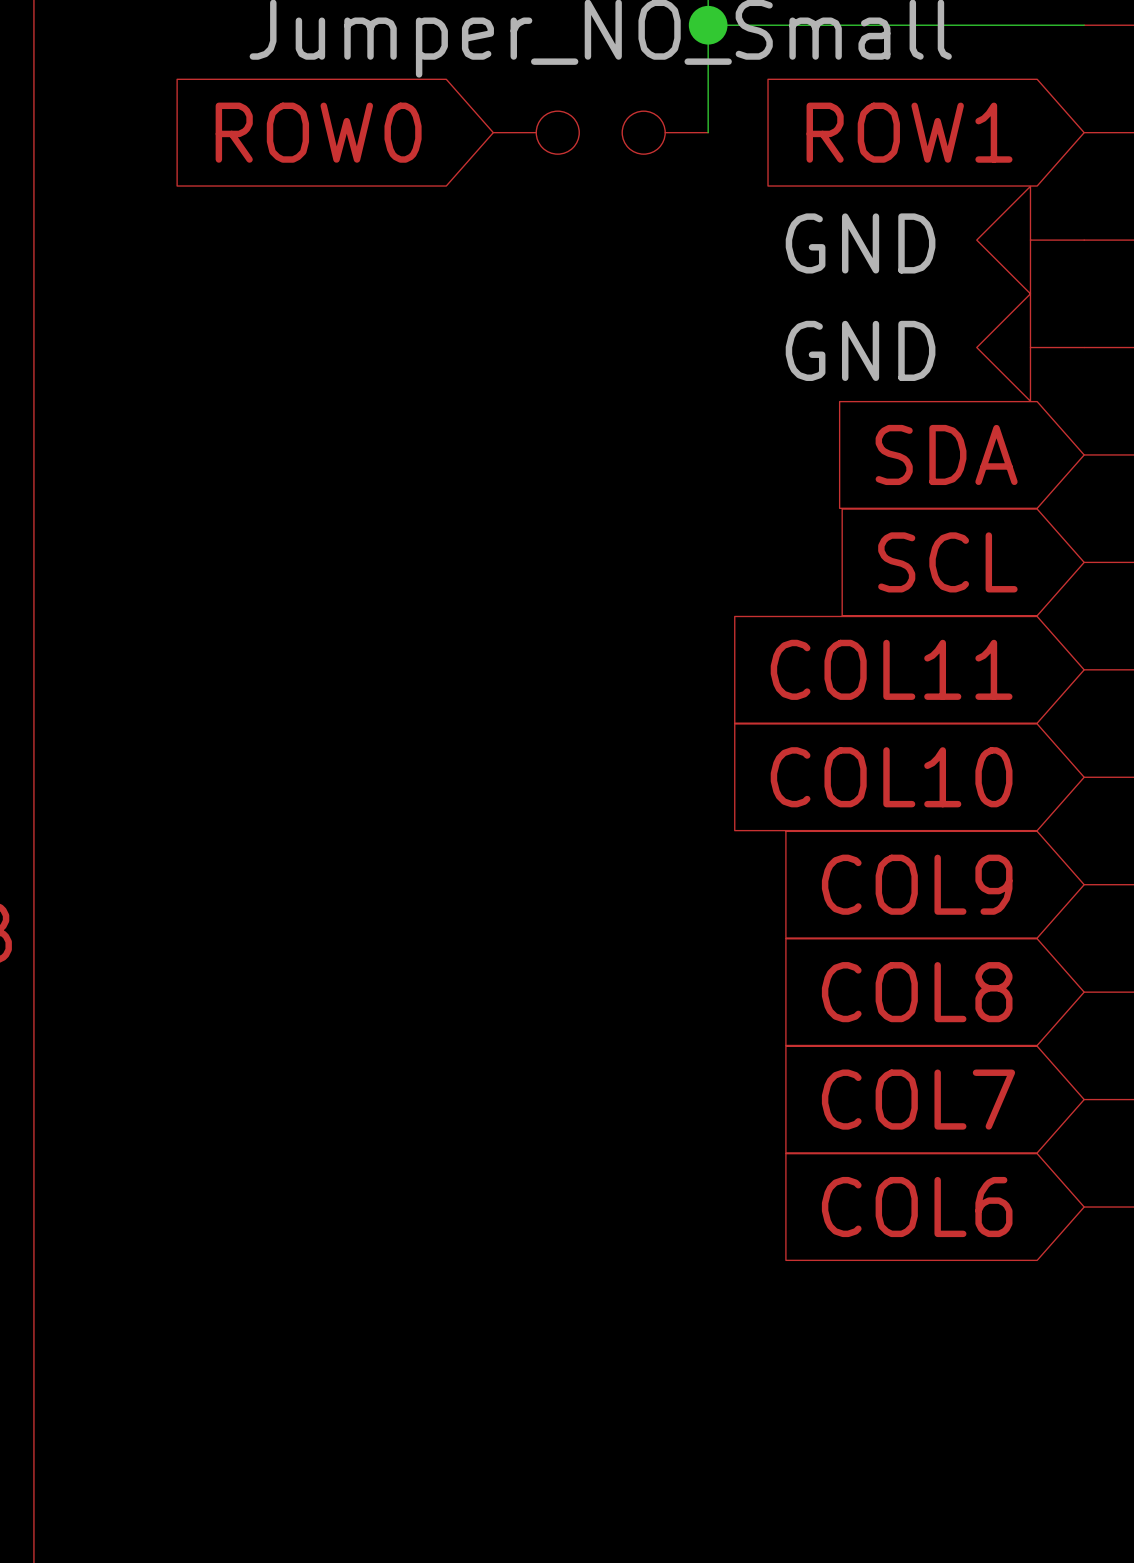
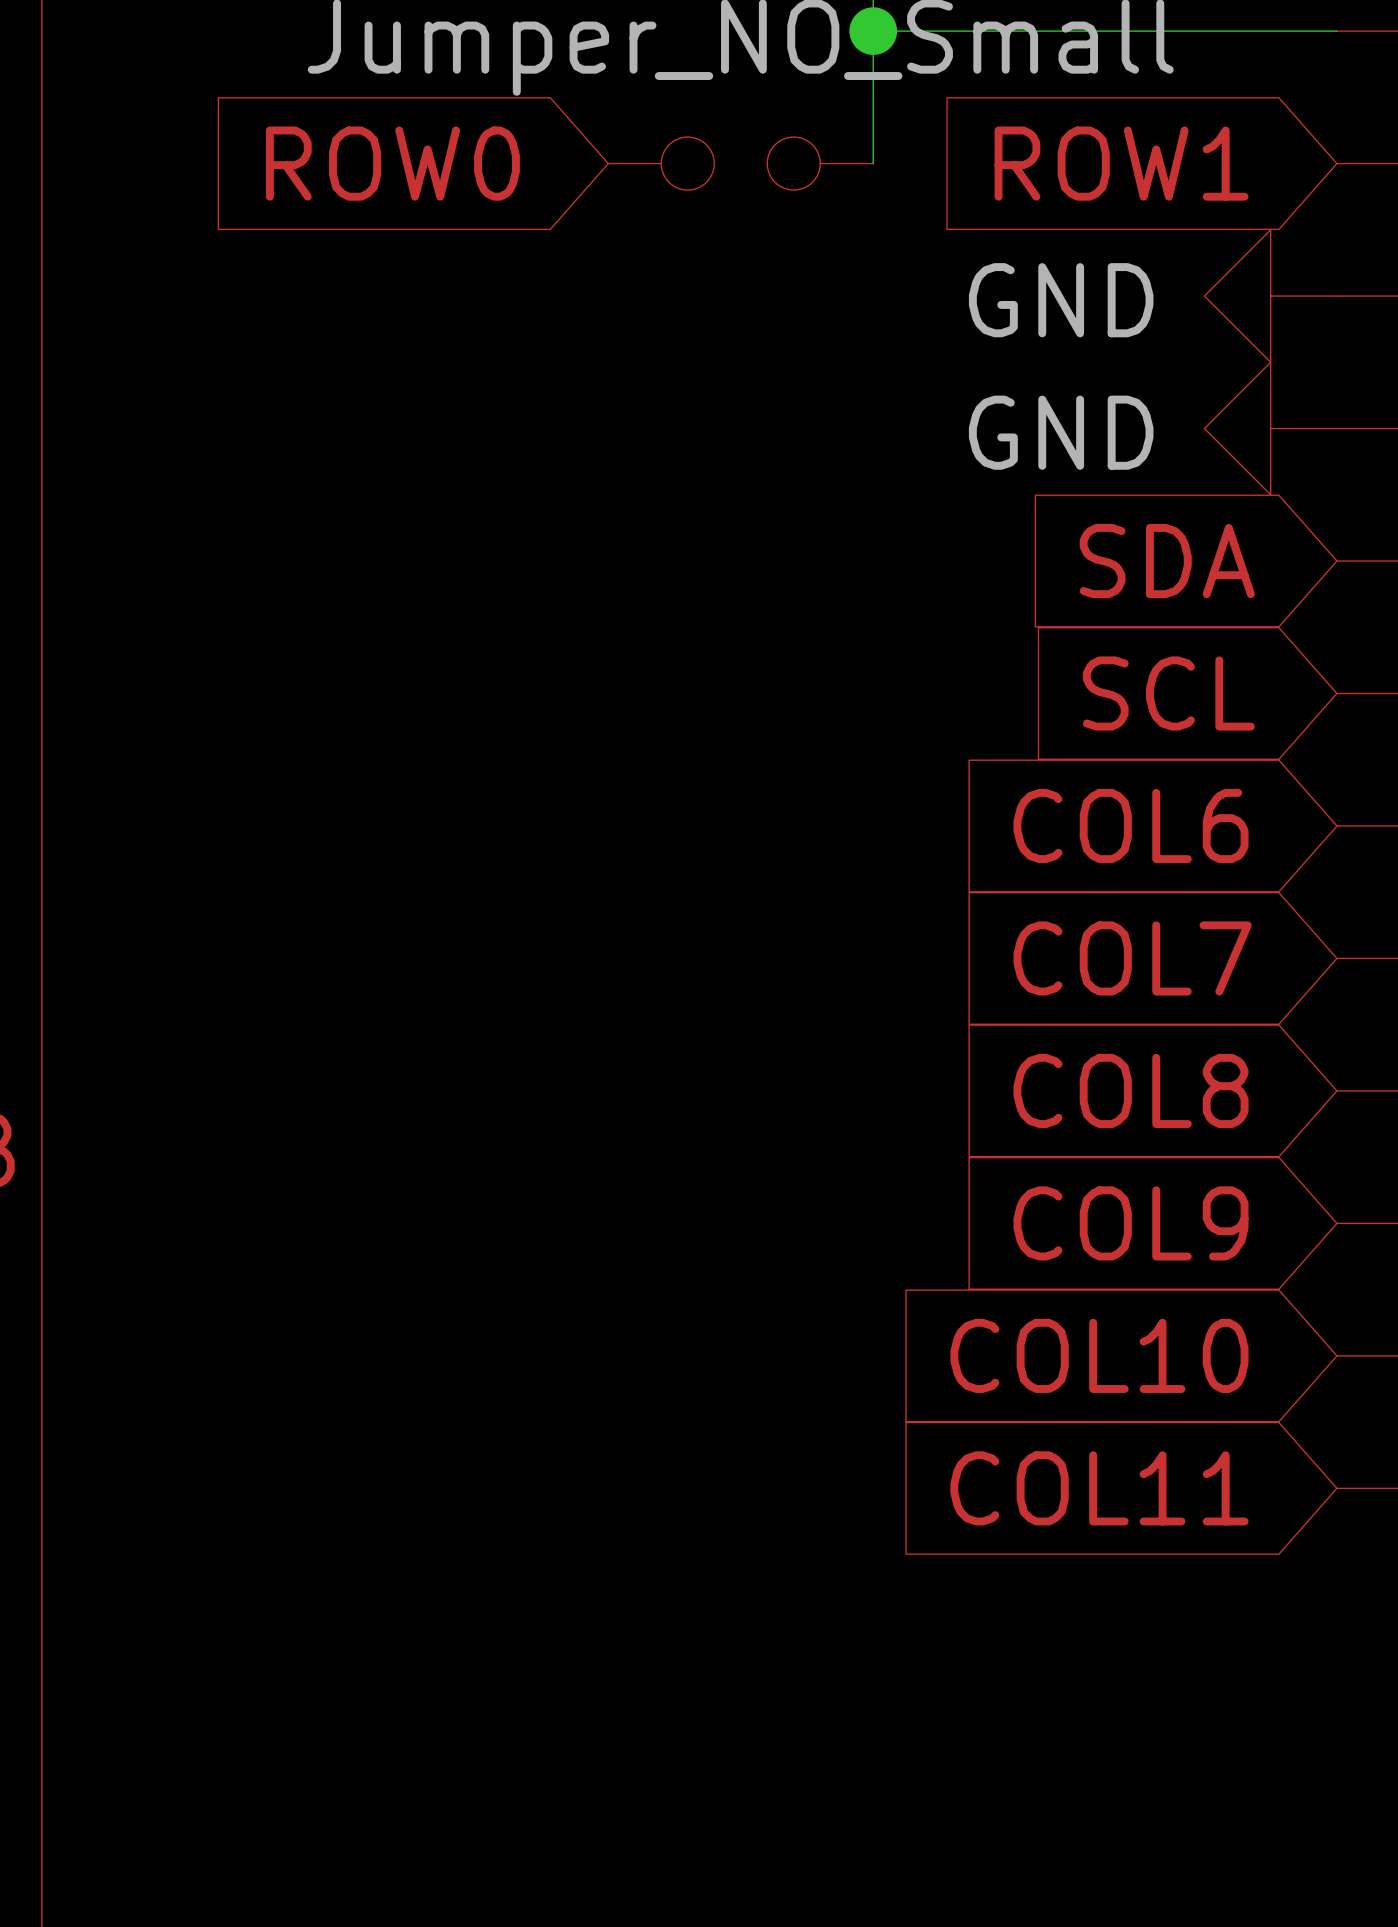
global label: COL11 (891, 669) -> COL6 (1131, 825)
global label: COL10 (891, 777) -> COL7 (1132, 958)
global label: COL9 (917, 884) -> COL8 (1131, 1090)
global label: COL8 (917, 992) -> COL9 (1131, 1223)
global label: COL7 (918, 1099) -> COL10 (1099, 1355)
global label: COL6 (917, 1207) -> COL11 (1099, 1488)

